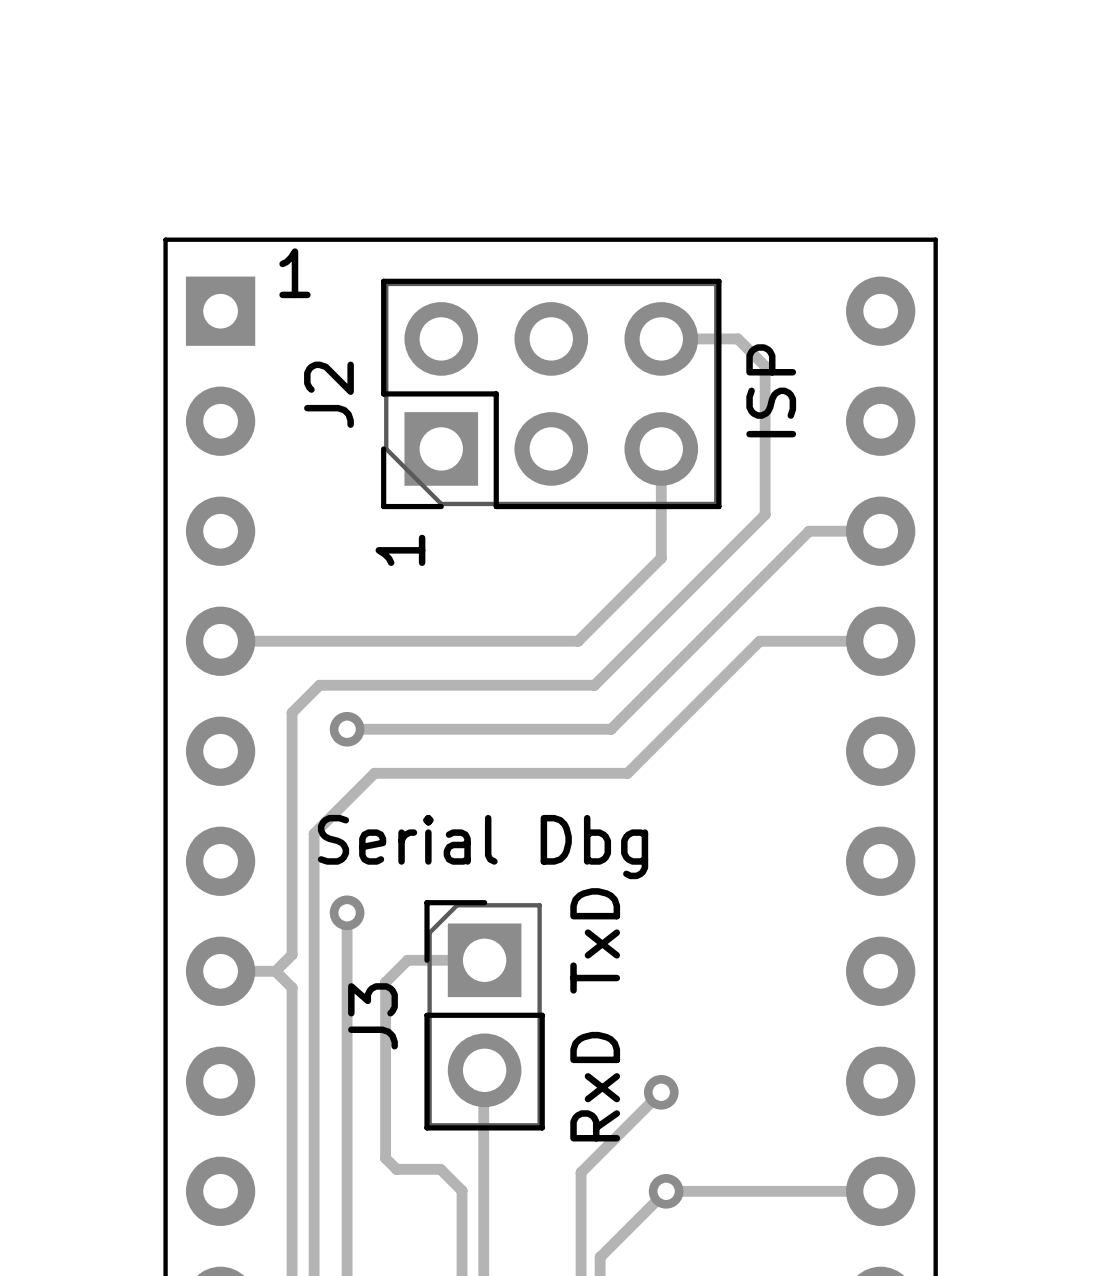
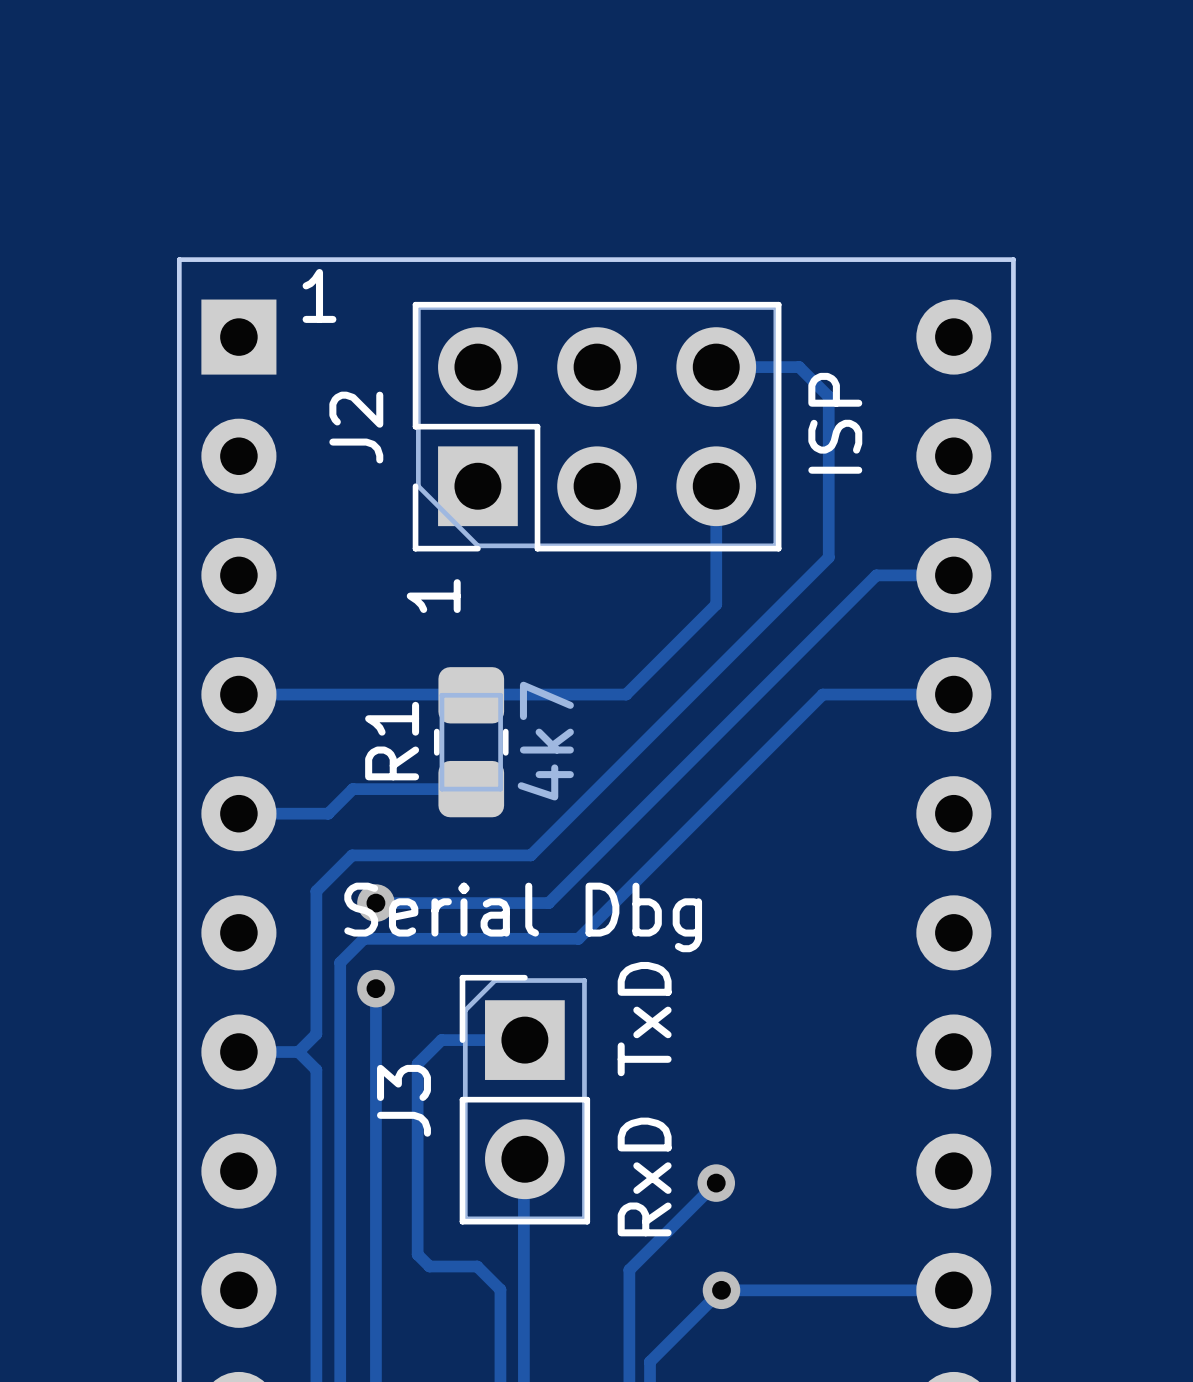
R1: none -> 4k7 (471, 742)
track: (594, 685) (319, 685) (292, 712) (292, 822) -> (644, 742) (530, 855) (352, 855) (316, 891)
track: none -> (471, 789) (352, 789) (328, 813) (238, 813)
track: (347, 729) (611, 729) -> (375, 903) (548, 903) (661, 789)
via position: (347, 729) -> (375, 903)
track: (627, 773) (374, 773) (314, 833) (314, 888) -> (679, 837) (578, 938) (364, 938) (340, 962)

